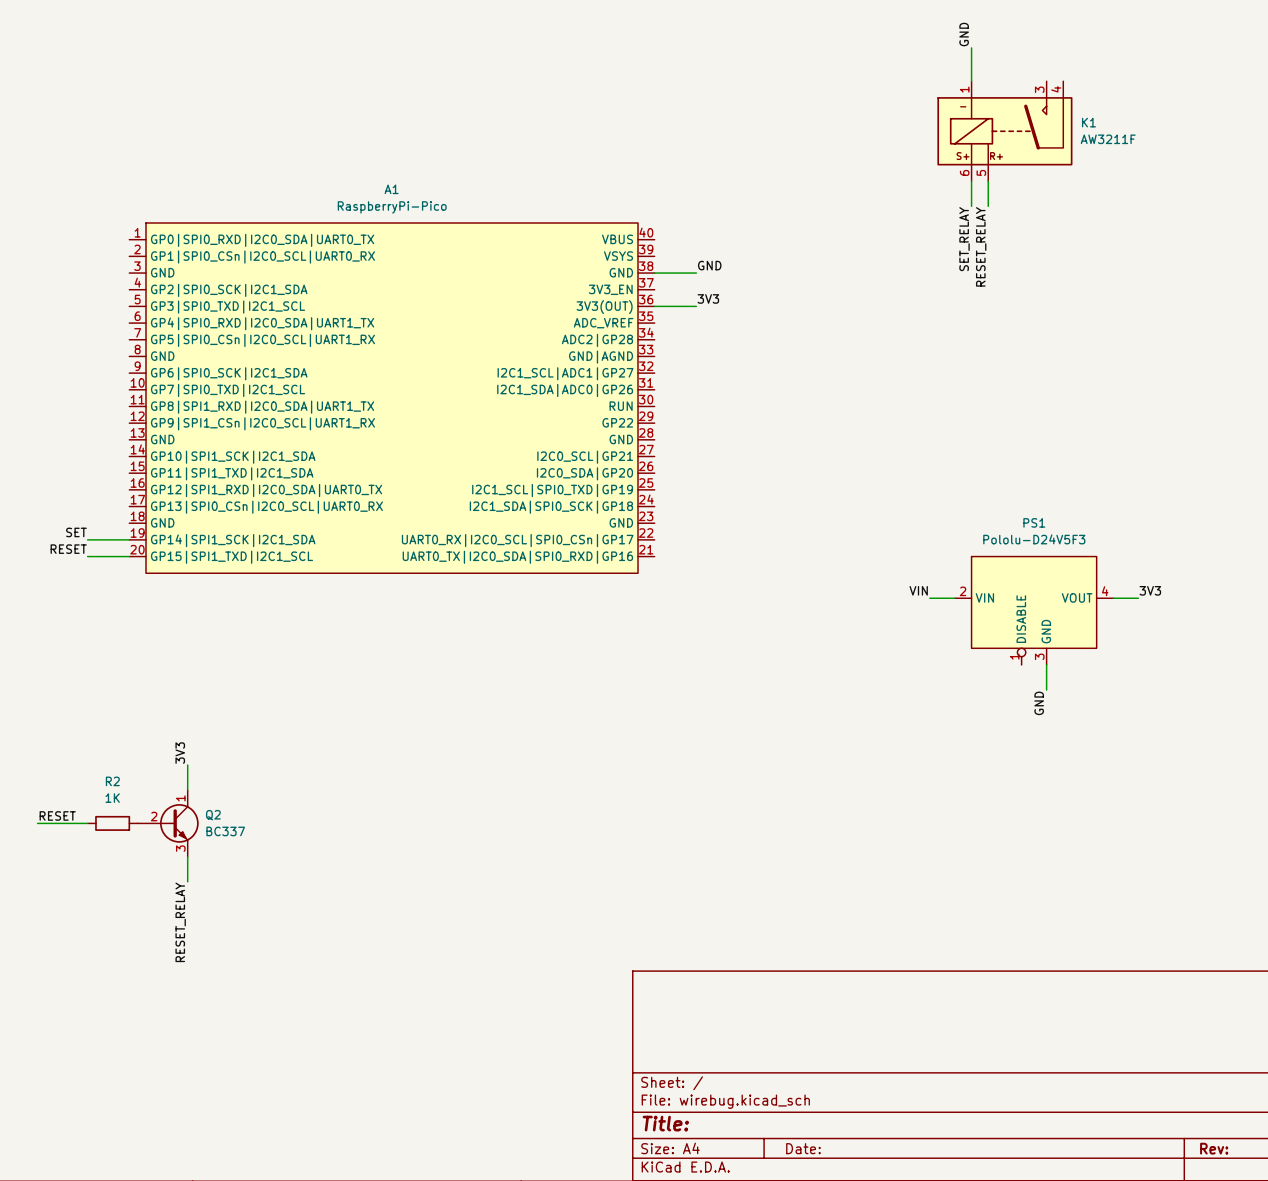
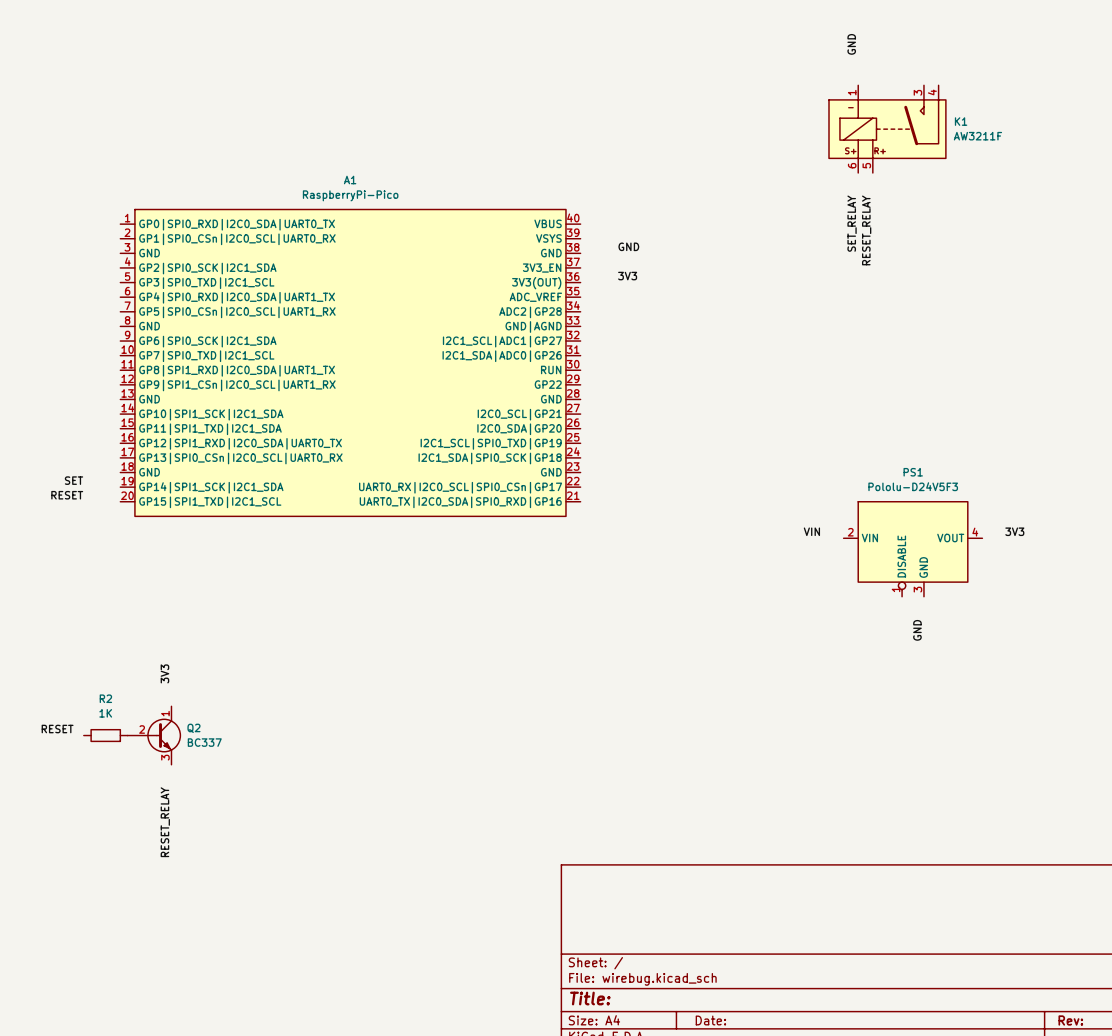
wire: (971, 47) (971, 81) -> none
wire: (971, 181) (971, 206) -> none
wire: (988, 181) (988, 206) -> none
wire: (654, 273) (696, 273) -> none
wire: (654, 306) (696, 306) -> none
wire: (87, 539) (129, 539) -> none
wire: (87, 556) (129, 556) -> none
wire: (929, 598) (954, 598) -> none
wire: (1113, 598) (1138, 598) -> none
wire: (1046, 664) (1046, 689) -> none
wire: (187, 765) (187, 790) -> none
wire: (37, 823) (87, 823) -> none
wire: (187, 856) (187, 881) -> none

